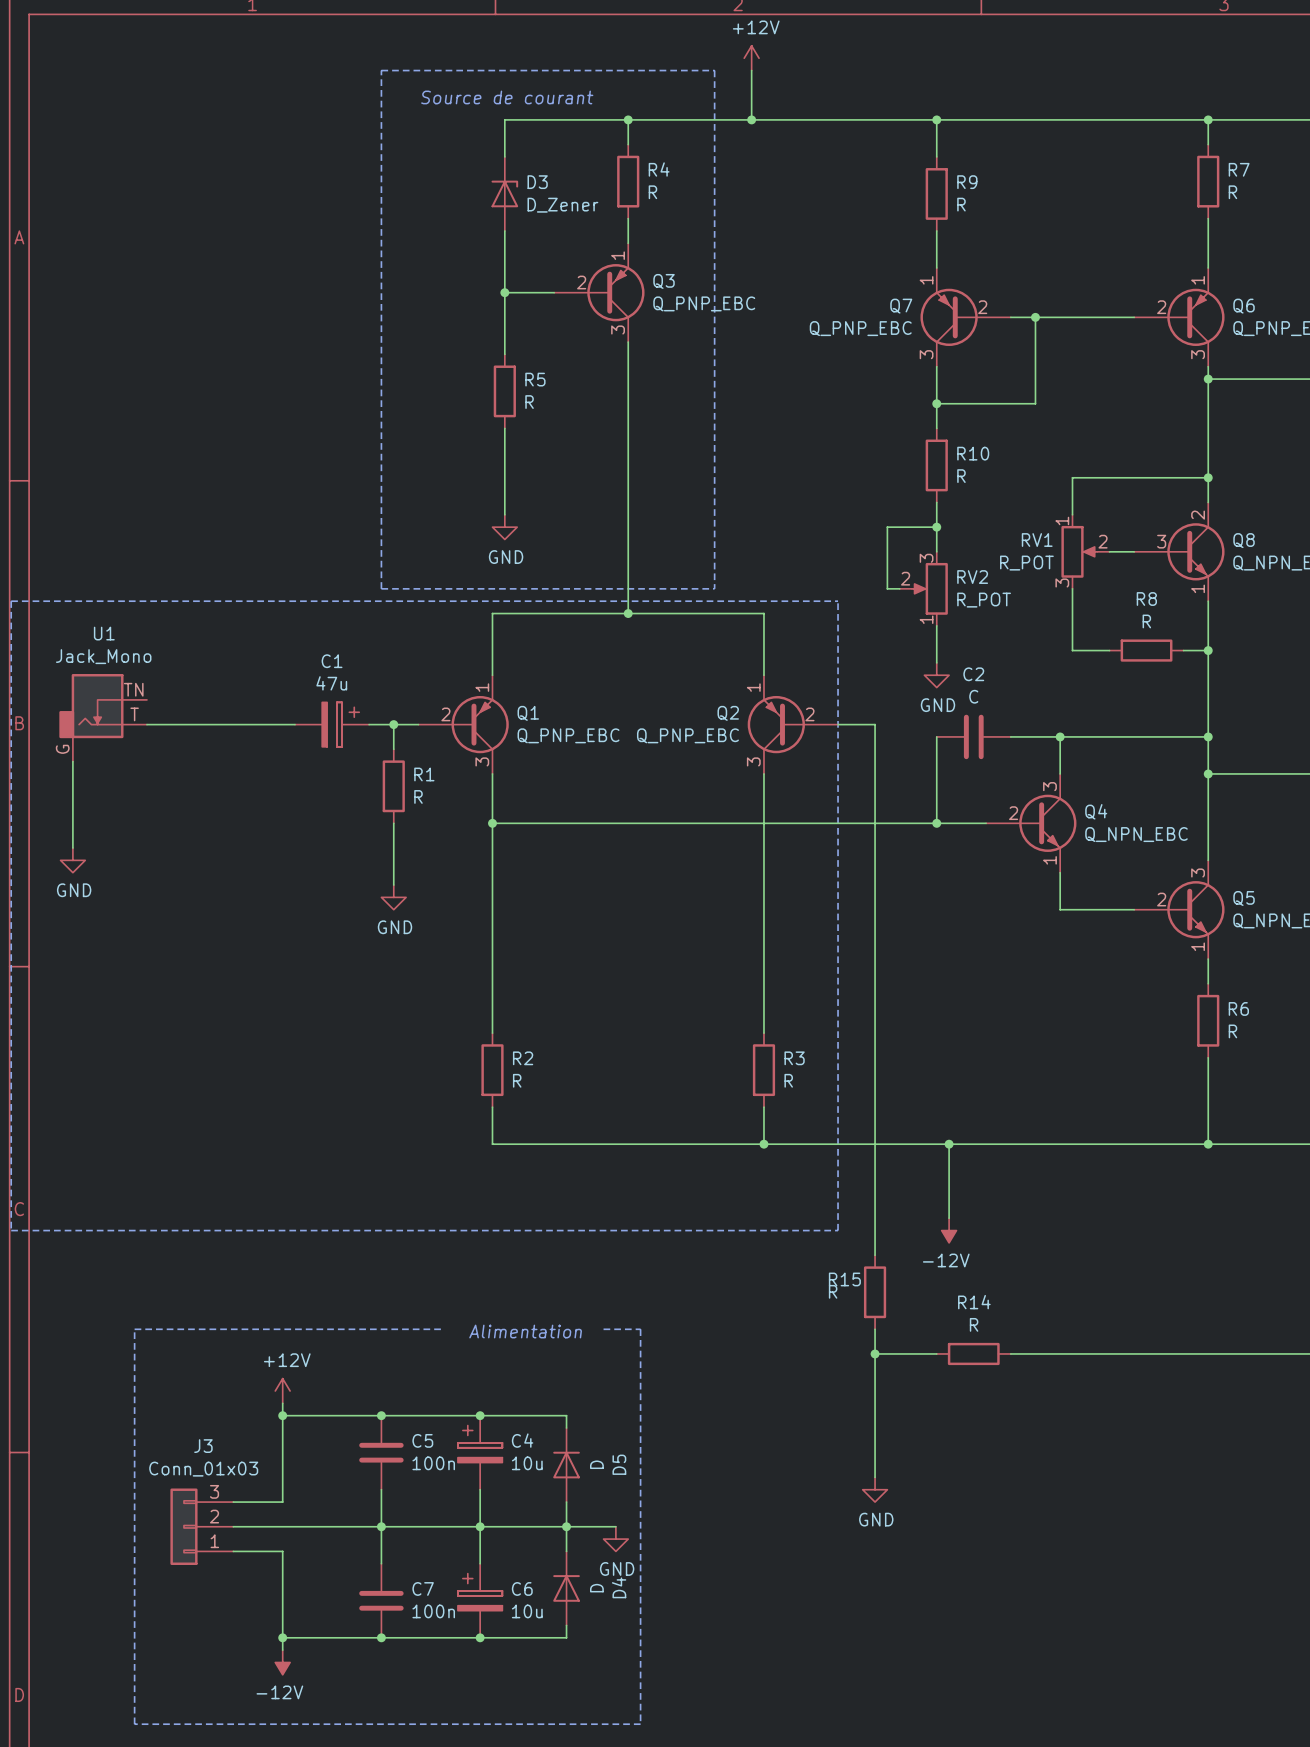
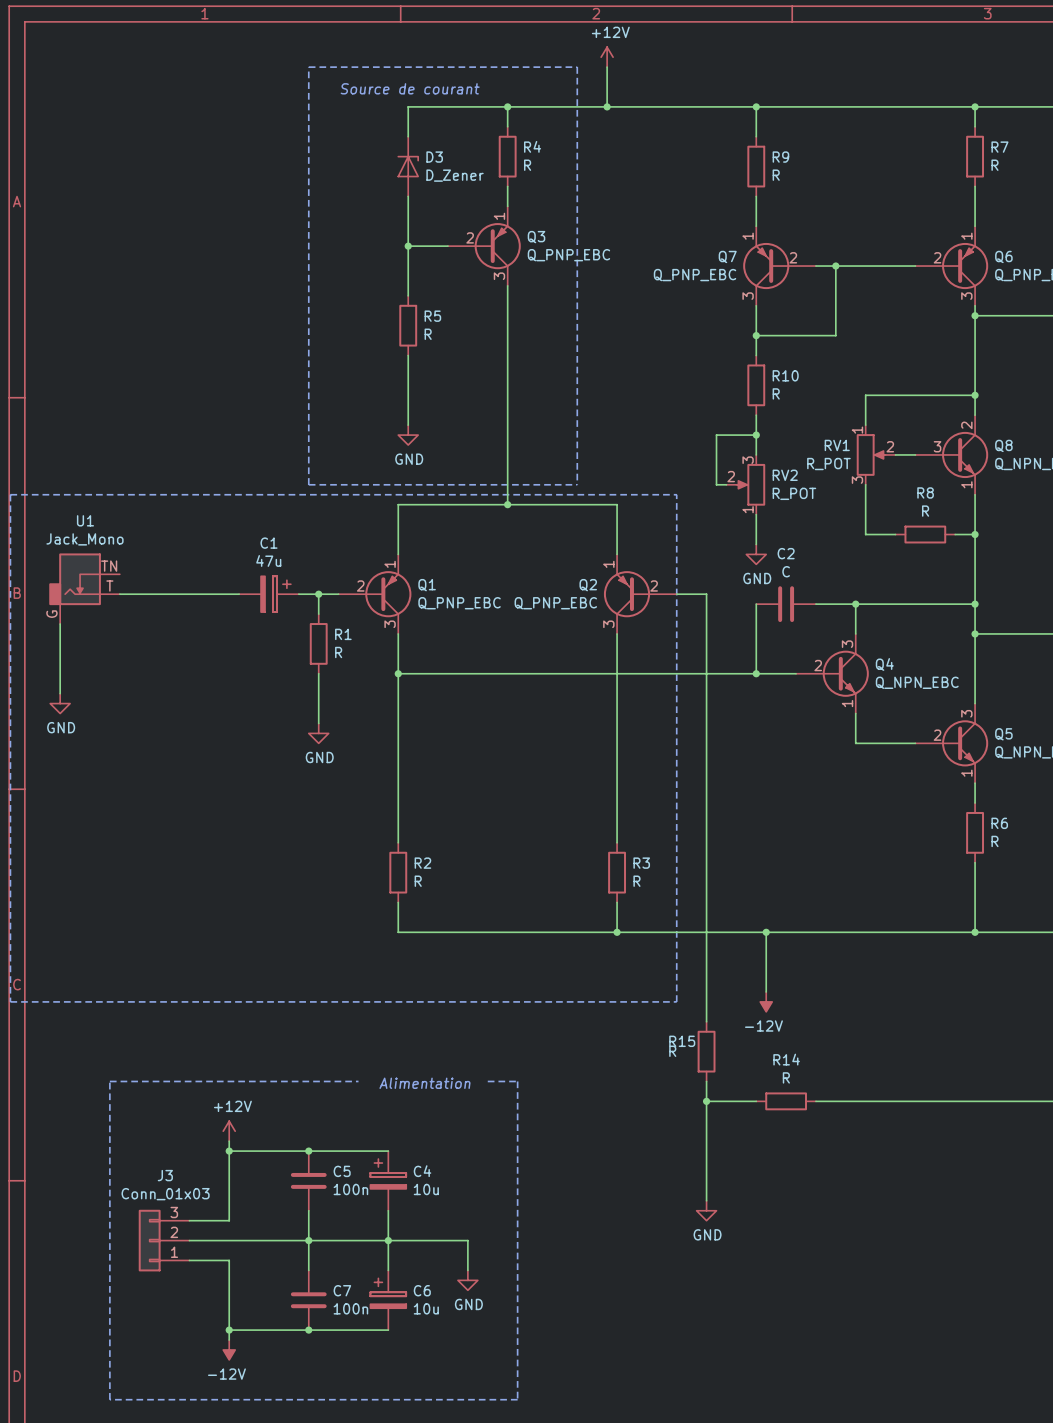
wire: (480, 1415) (566, 1415) (566, 1428) -> none
junction: (480, 1415) -> none
D5: D (566, 1465) -> none
wire: (566, 1502) (566, 1551) -> none
junction: (566, 1526) -> none
wire: (578, 1526) (615, 1526) -> (467, 1240) (467, 1270)
power symbol position: GND (615, 1539) -> GND (467, 1280)
D4: D (566, 1588) -> none
wire: (566, 1625) (566, 1637) (480, 1637) -> none
junction: (480, 1637) -> none

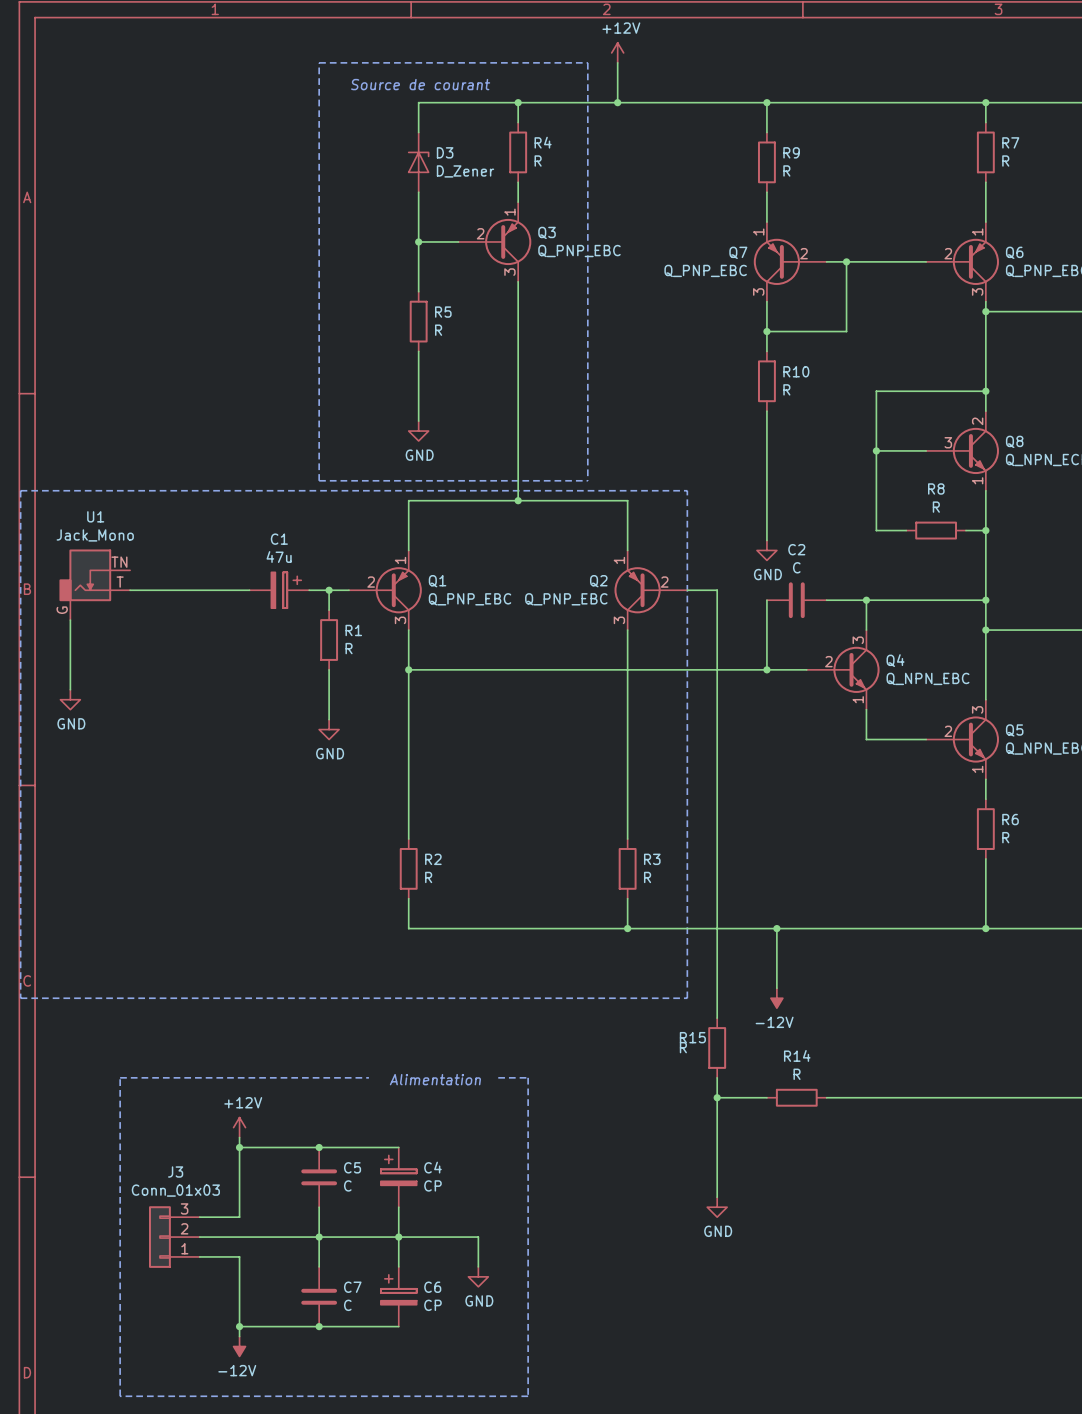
wire: none -> (876, 421) (876, 480)
wire: (756, 435) (716, 435) (716, 484) (726, 484) -> none
junction: (756, 435) -> none
wire: none -> (766, 450) (766, 510)
junction: none -> (876, 450)
RV1: R_POT (876, 454) -> none
RV2: R_POT (745, 484) -> none
C5 value: 100n (350, 1189) -> C (347, 1185)
C4 value: 10u (426, 1189) -> CP (432, 1185)
C7 value: 100n (350, 1308) -> C (347, 1305)
C6 value: 10u (426, 1308) -> CP (432, 1305)

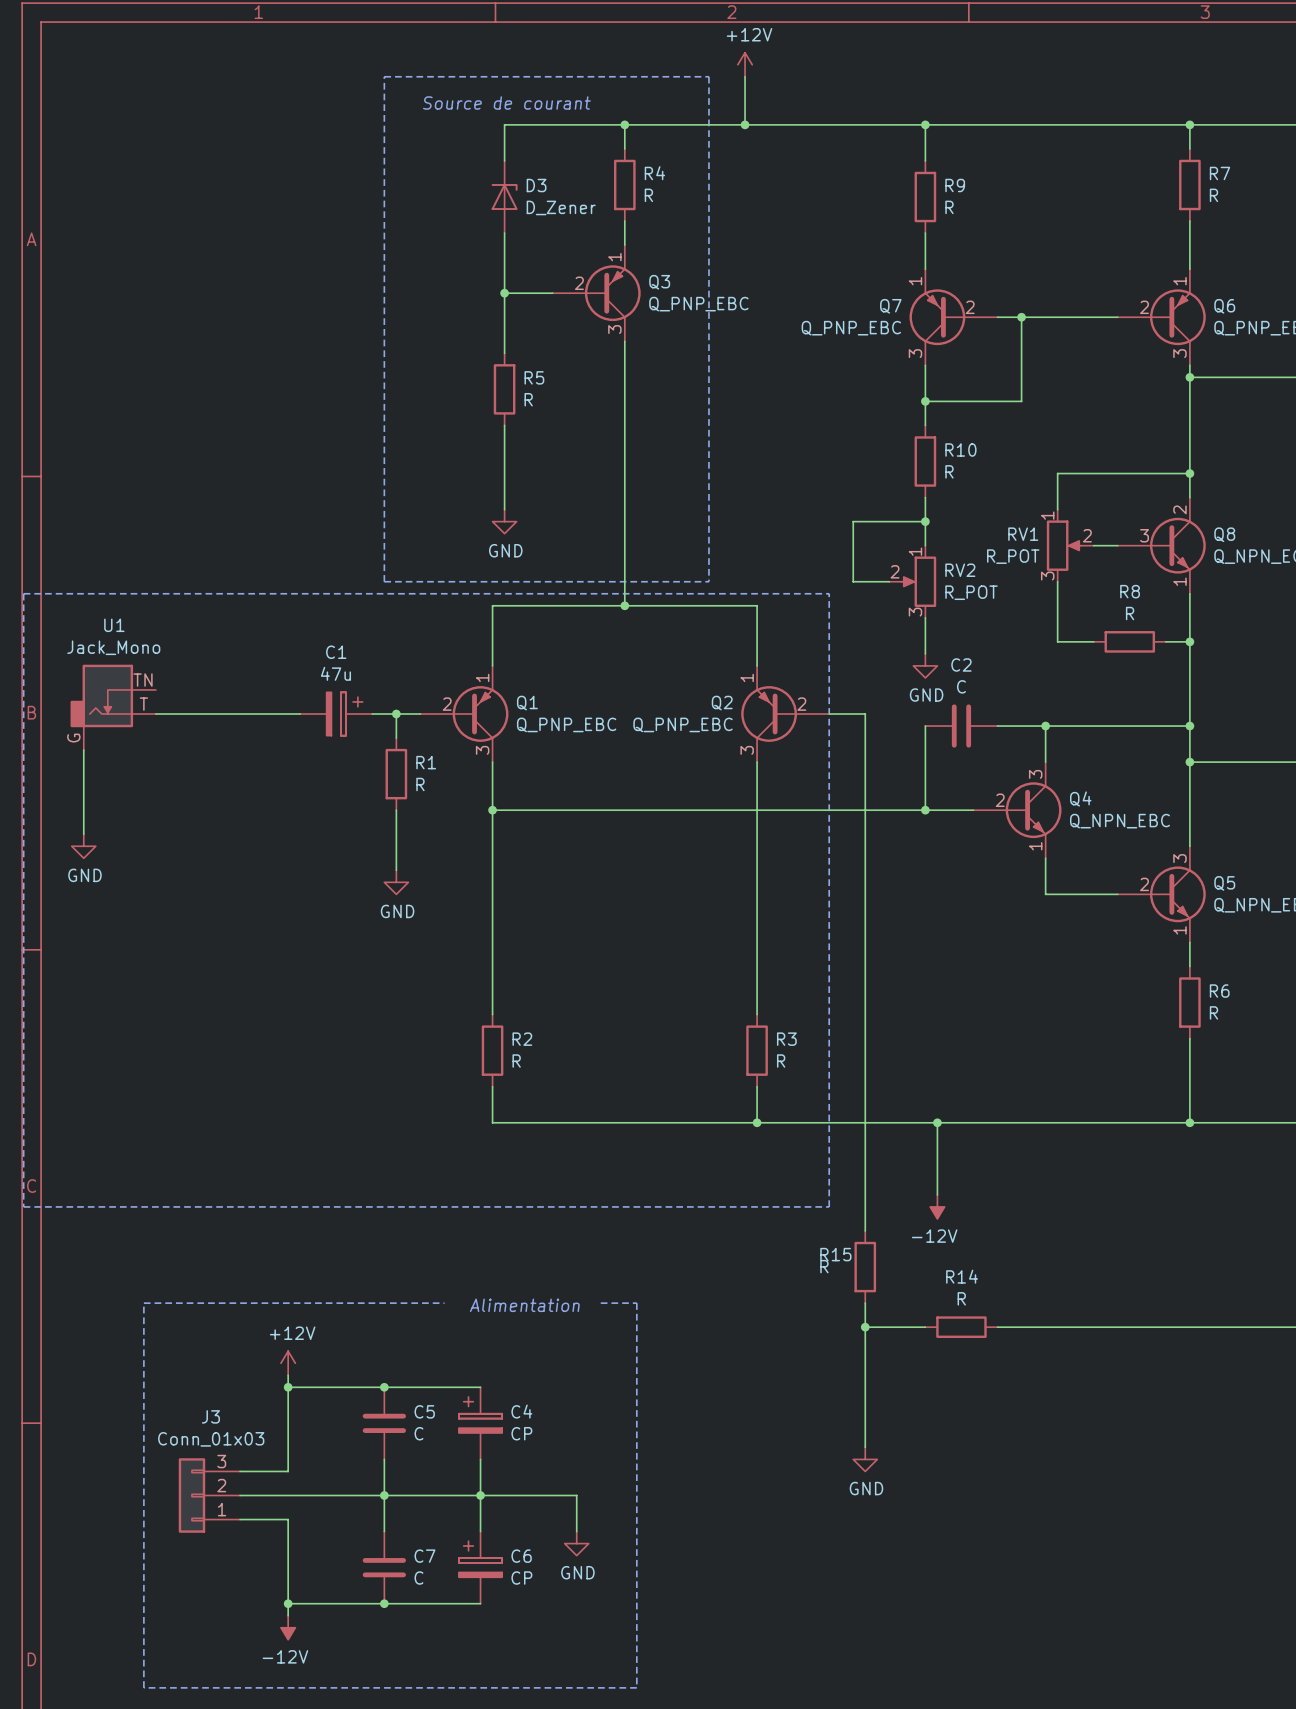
wire: (876, 421) (876, 480) -> none
wire: none -> (925, 521) (853, 521) (853, 581) (889, 581)
junction: none -> (925, 521)
wire: (766, 450) (766, 510) -> none
junction: (876, 450) -> none
RV1: none -> R_POT (1070, 545)
RV2: none -> R_POT (912, 581)

